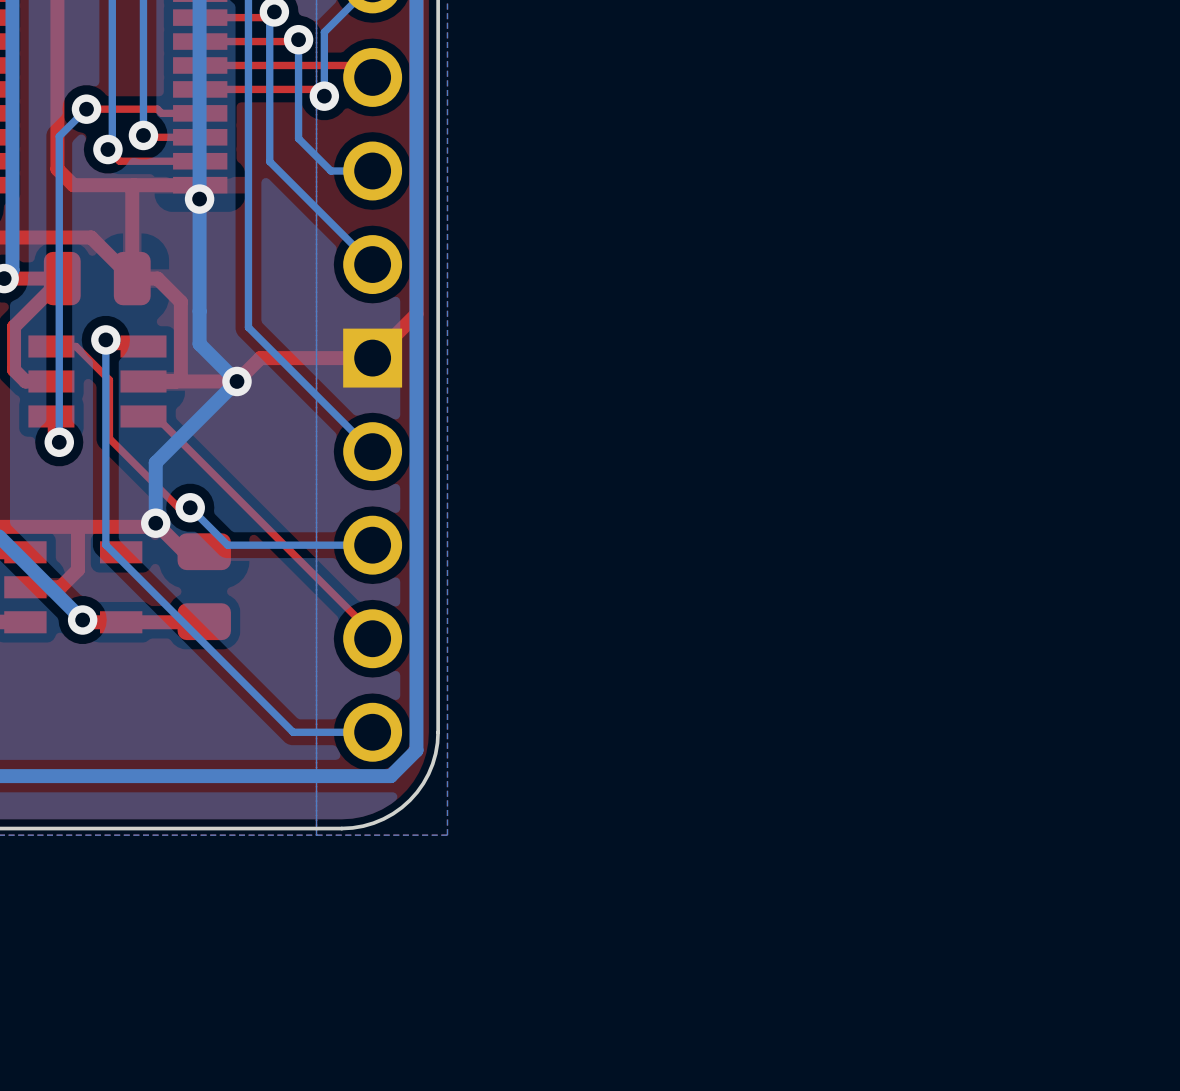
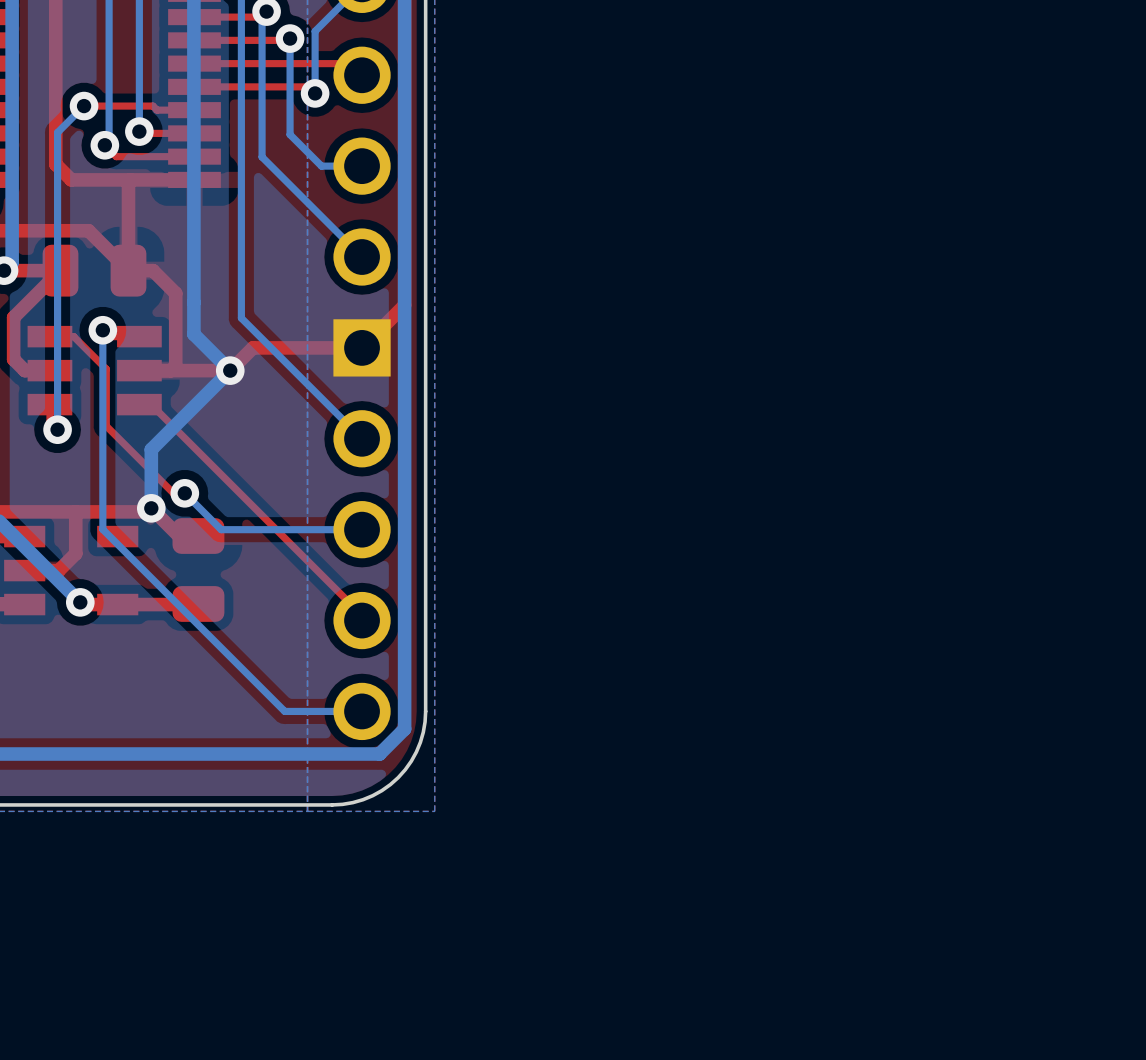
via: (199, 199) -> none

